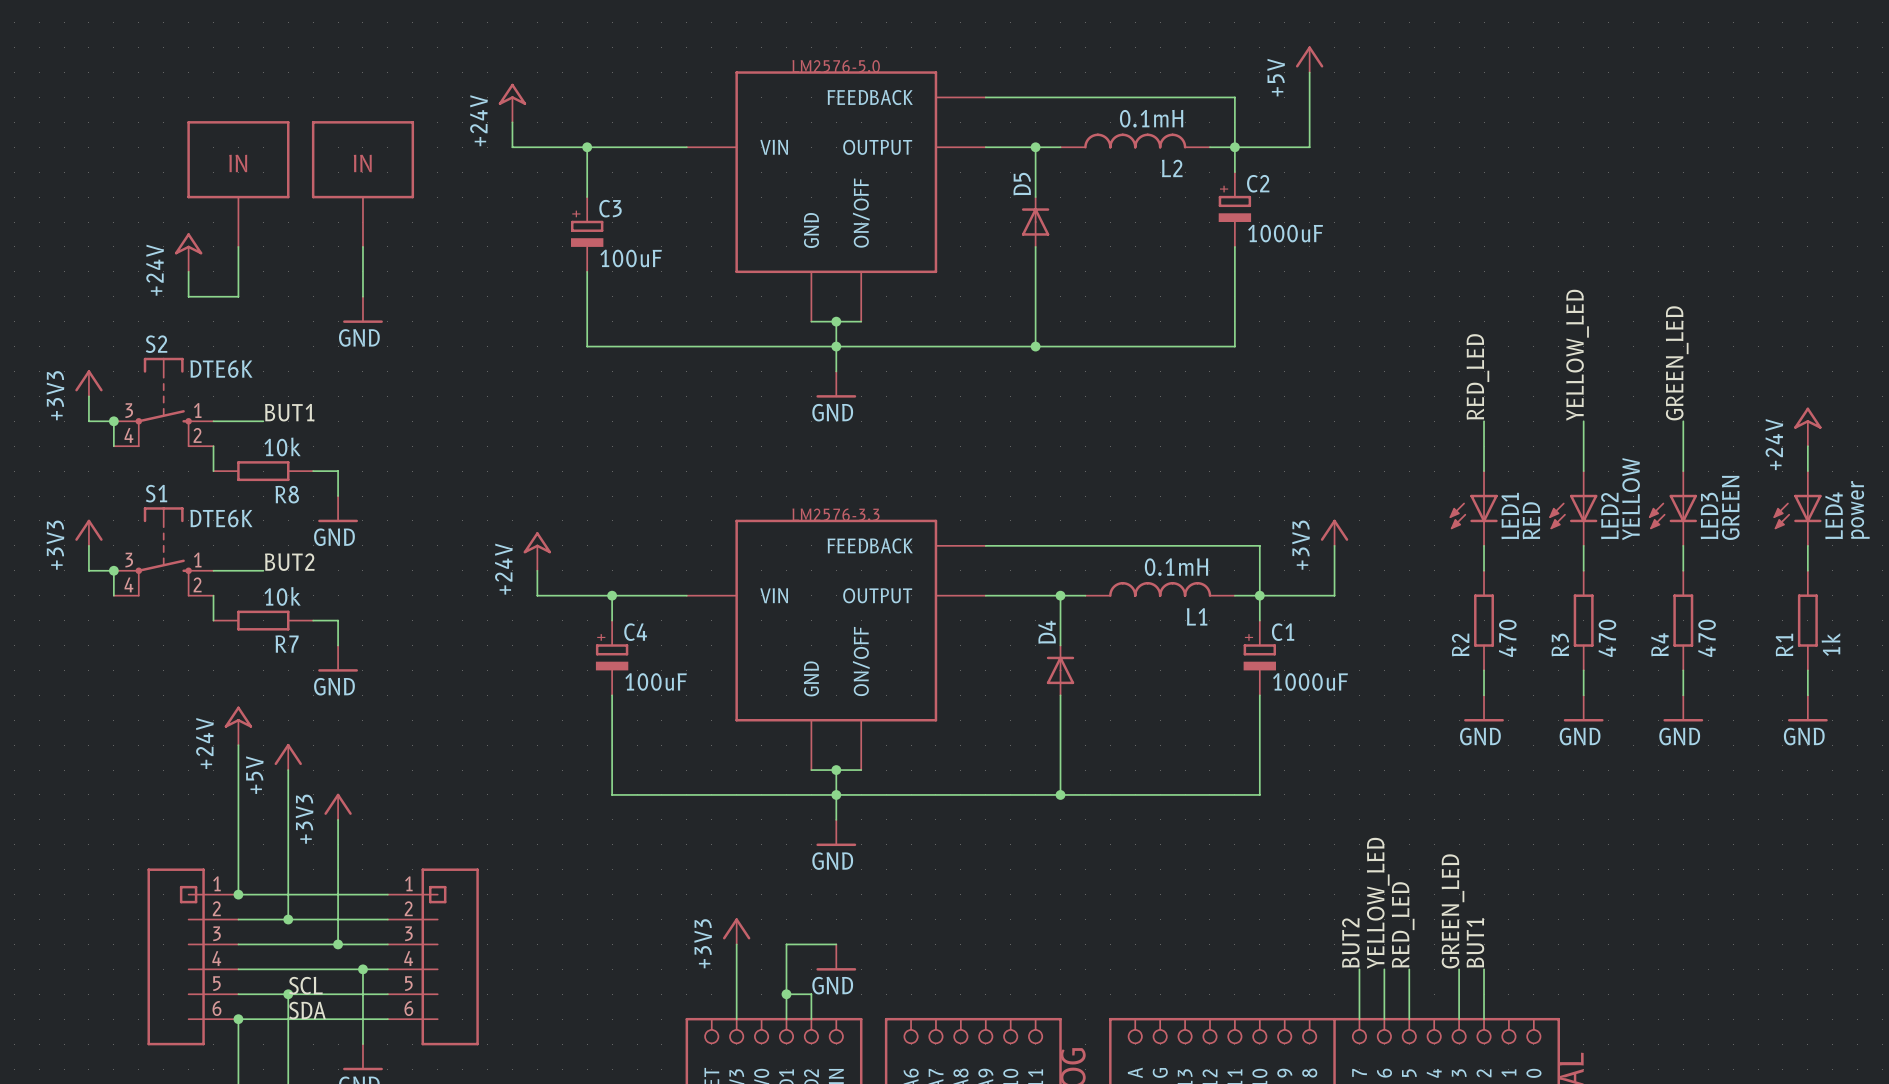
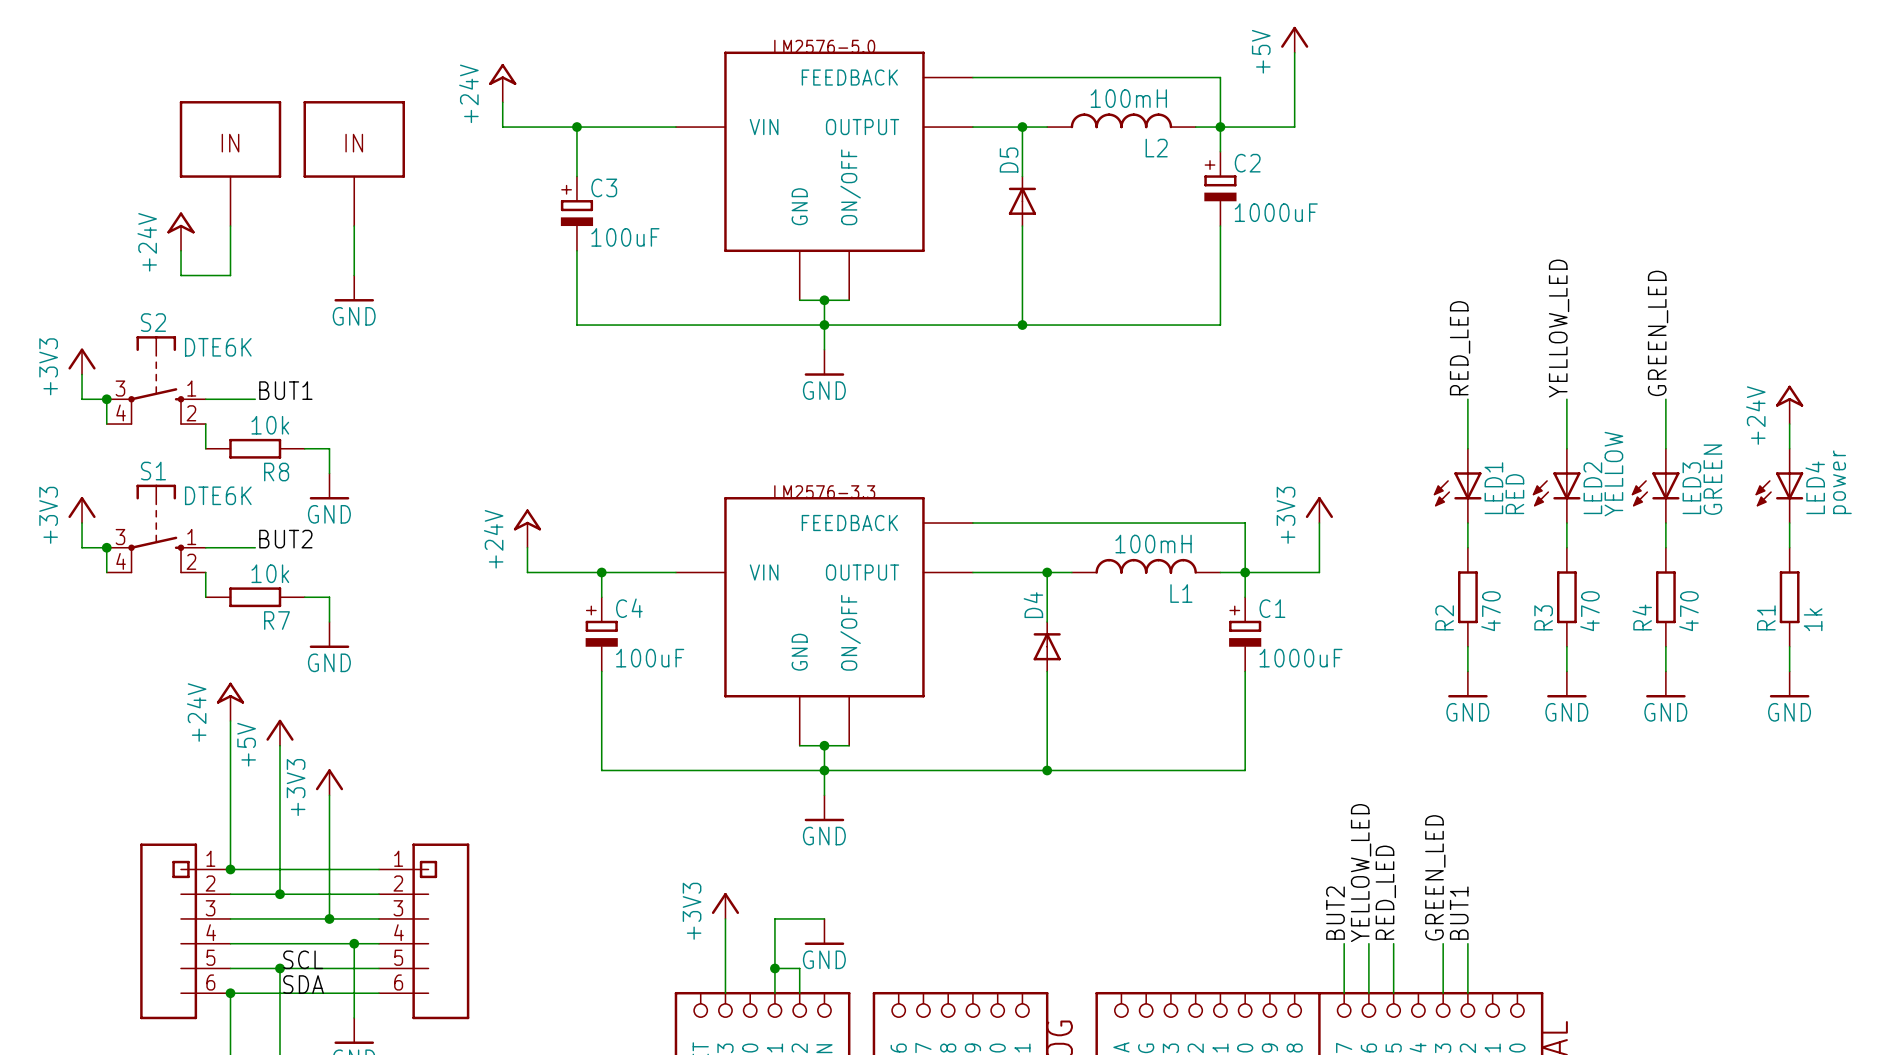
L2 value: 0.1mH (1151, 118) -> 100mH (1128, 98)
L1 value: 0.1mH (1176, 567) -> 100mH (1153, 544)

